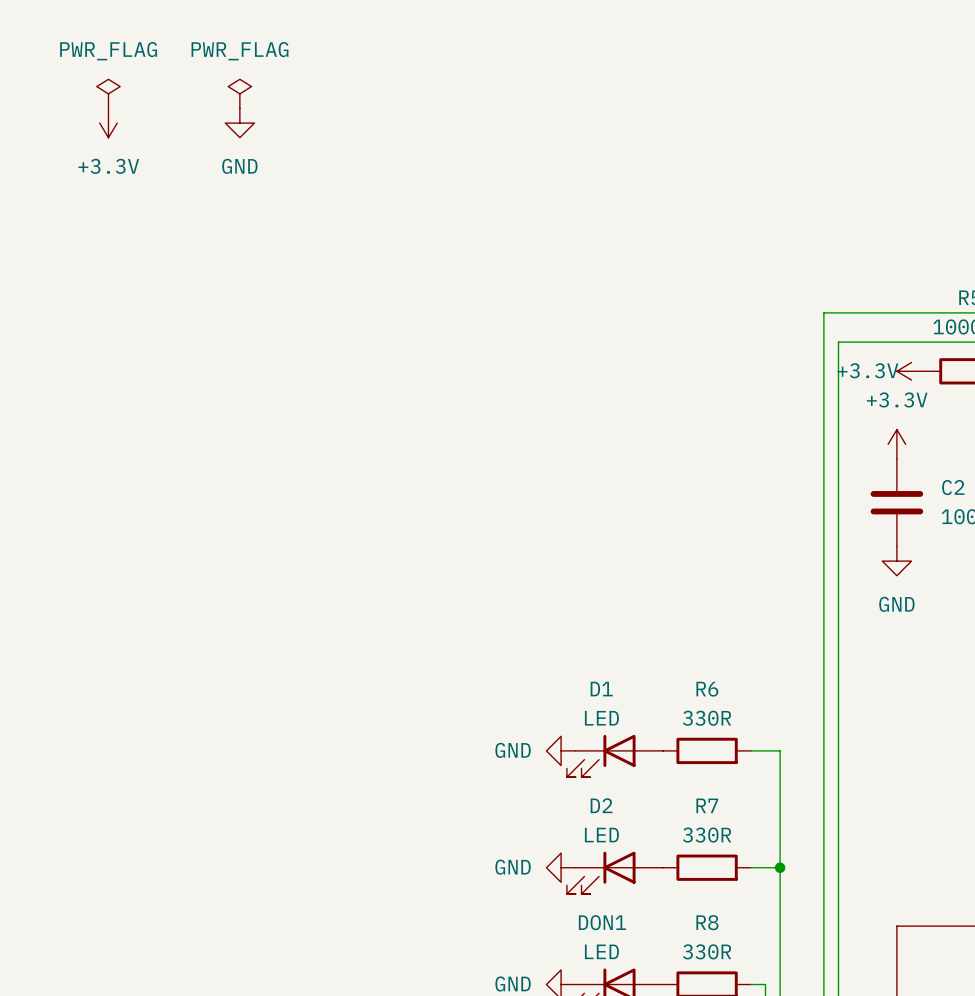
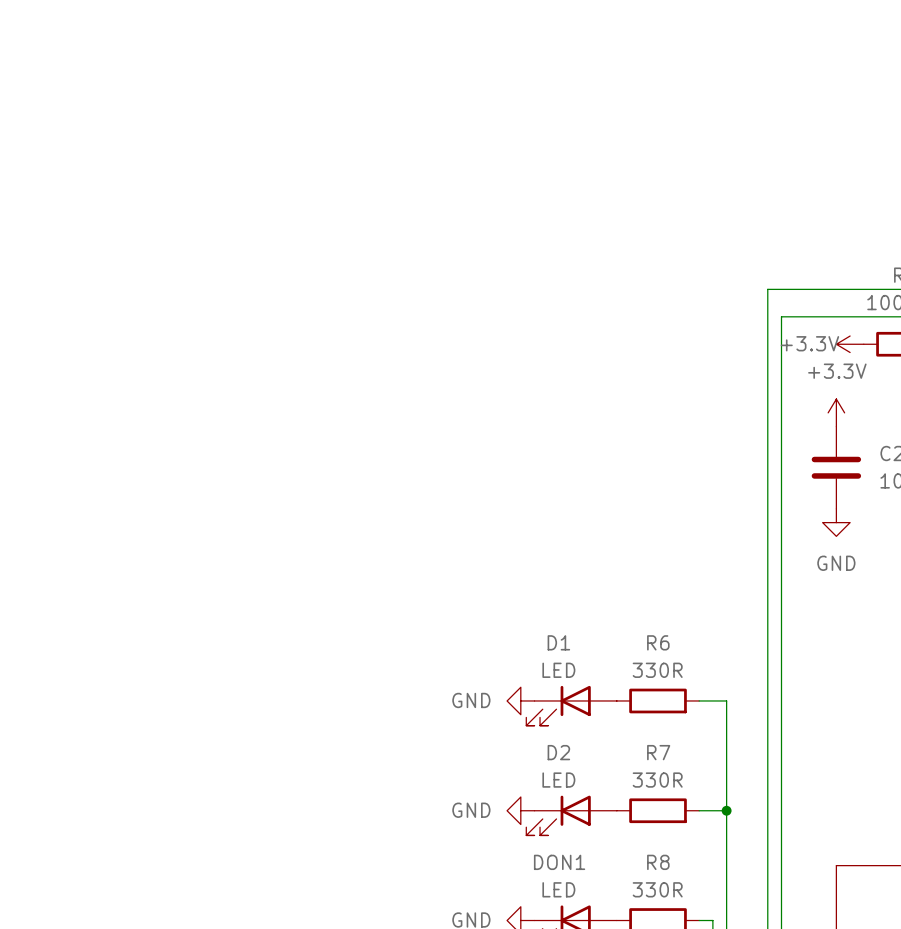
power symbol: PWR_FLAG (108, 93) -> none
power symbol: PWR_FLAG (239, 93) -> none
power symbol: +3.3V (108, 123) -> none
power symbol: GND (239, 123) -> none

